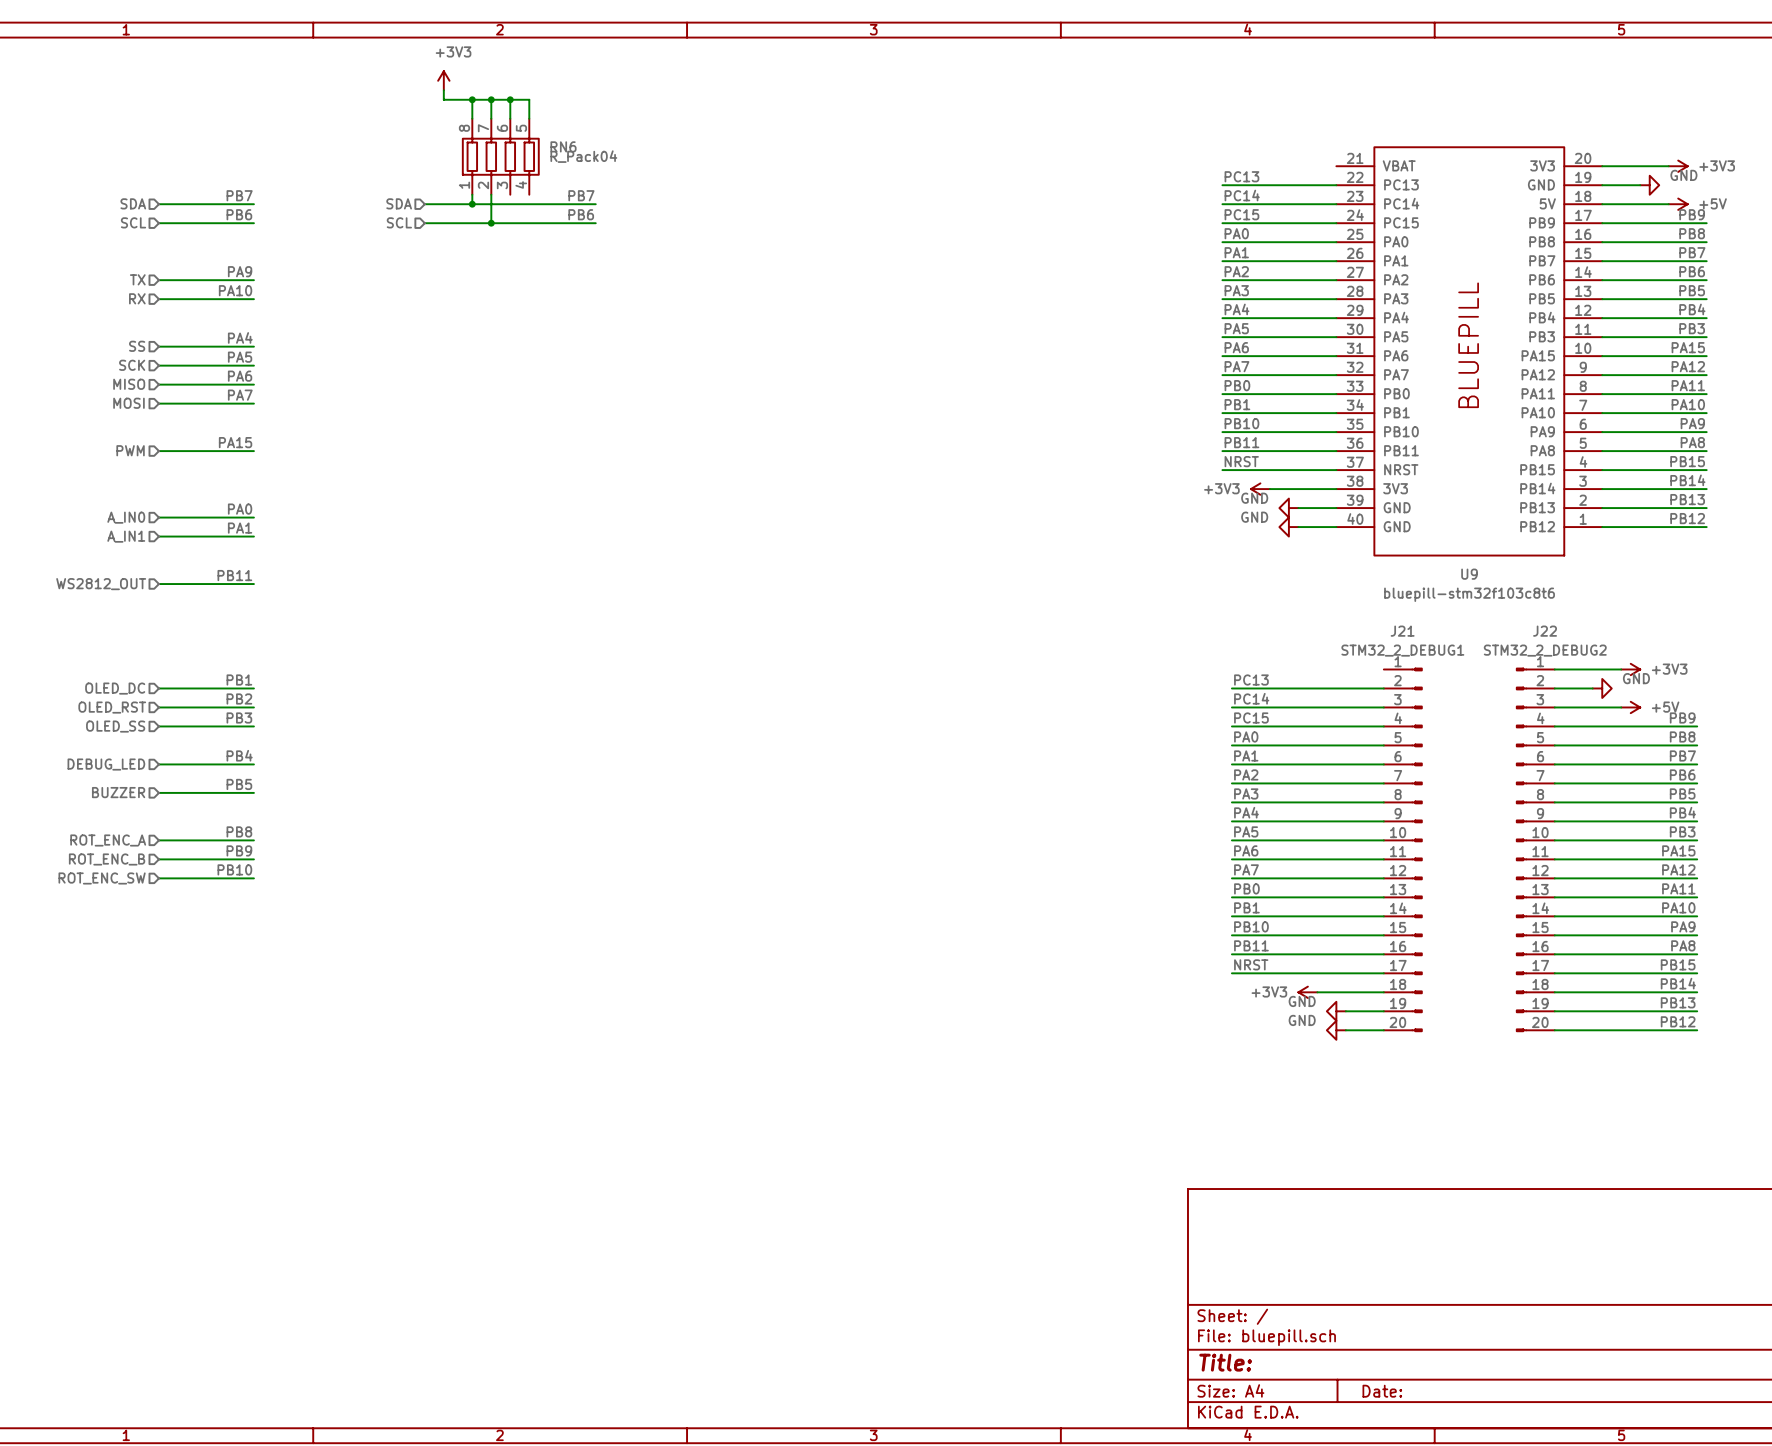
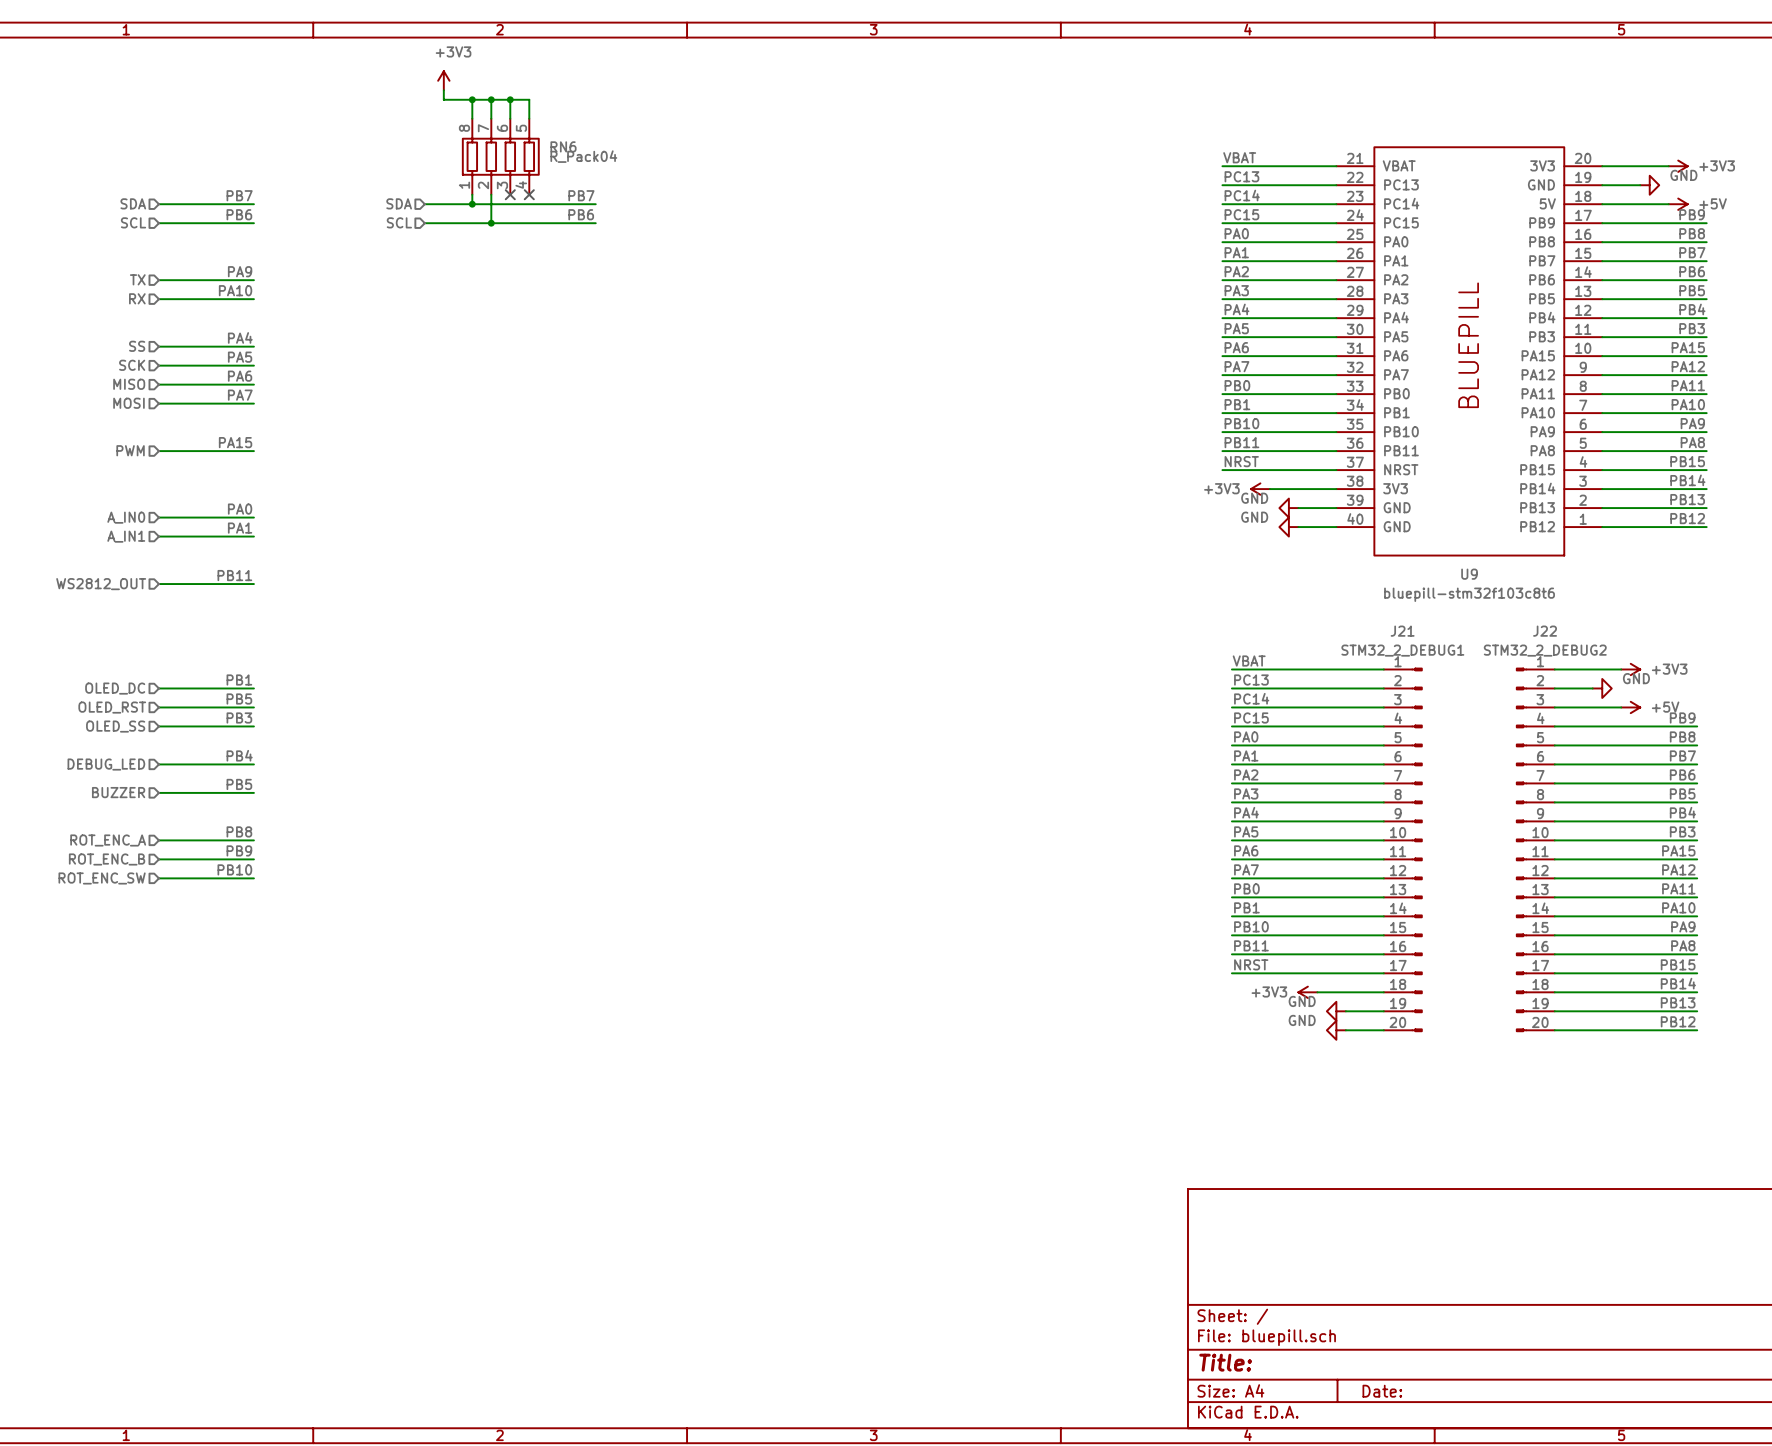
label: none -> VBAT (1239, 157)
wire: none -> (1222, 166) (1336, 166)
no-connect mark: none -> (510, 194)
no-connect mark: none -> (529, 194)
label: none -> VBAT (1249, 661)
wire: none -> (1231, 669) (1383, 669)
label: PB2 (239, 698) -> PB5 (239, 698)

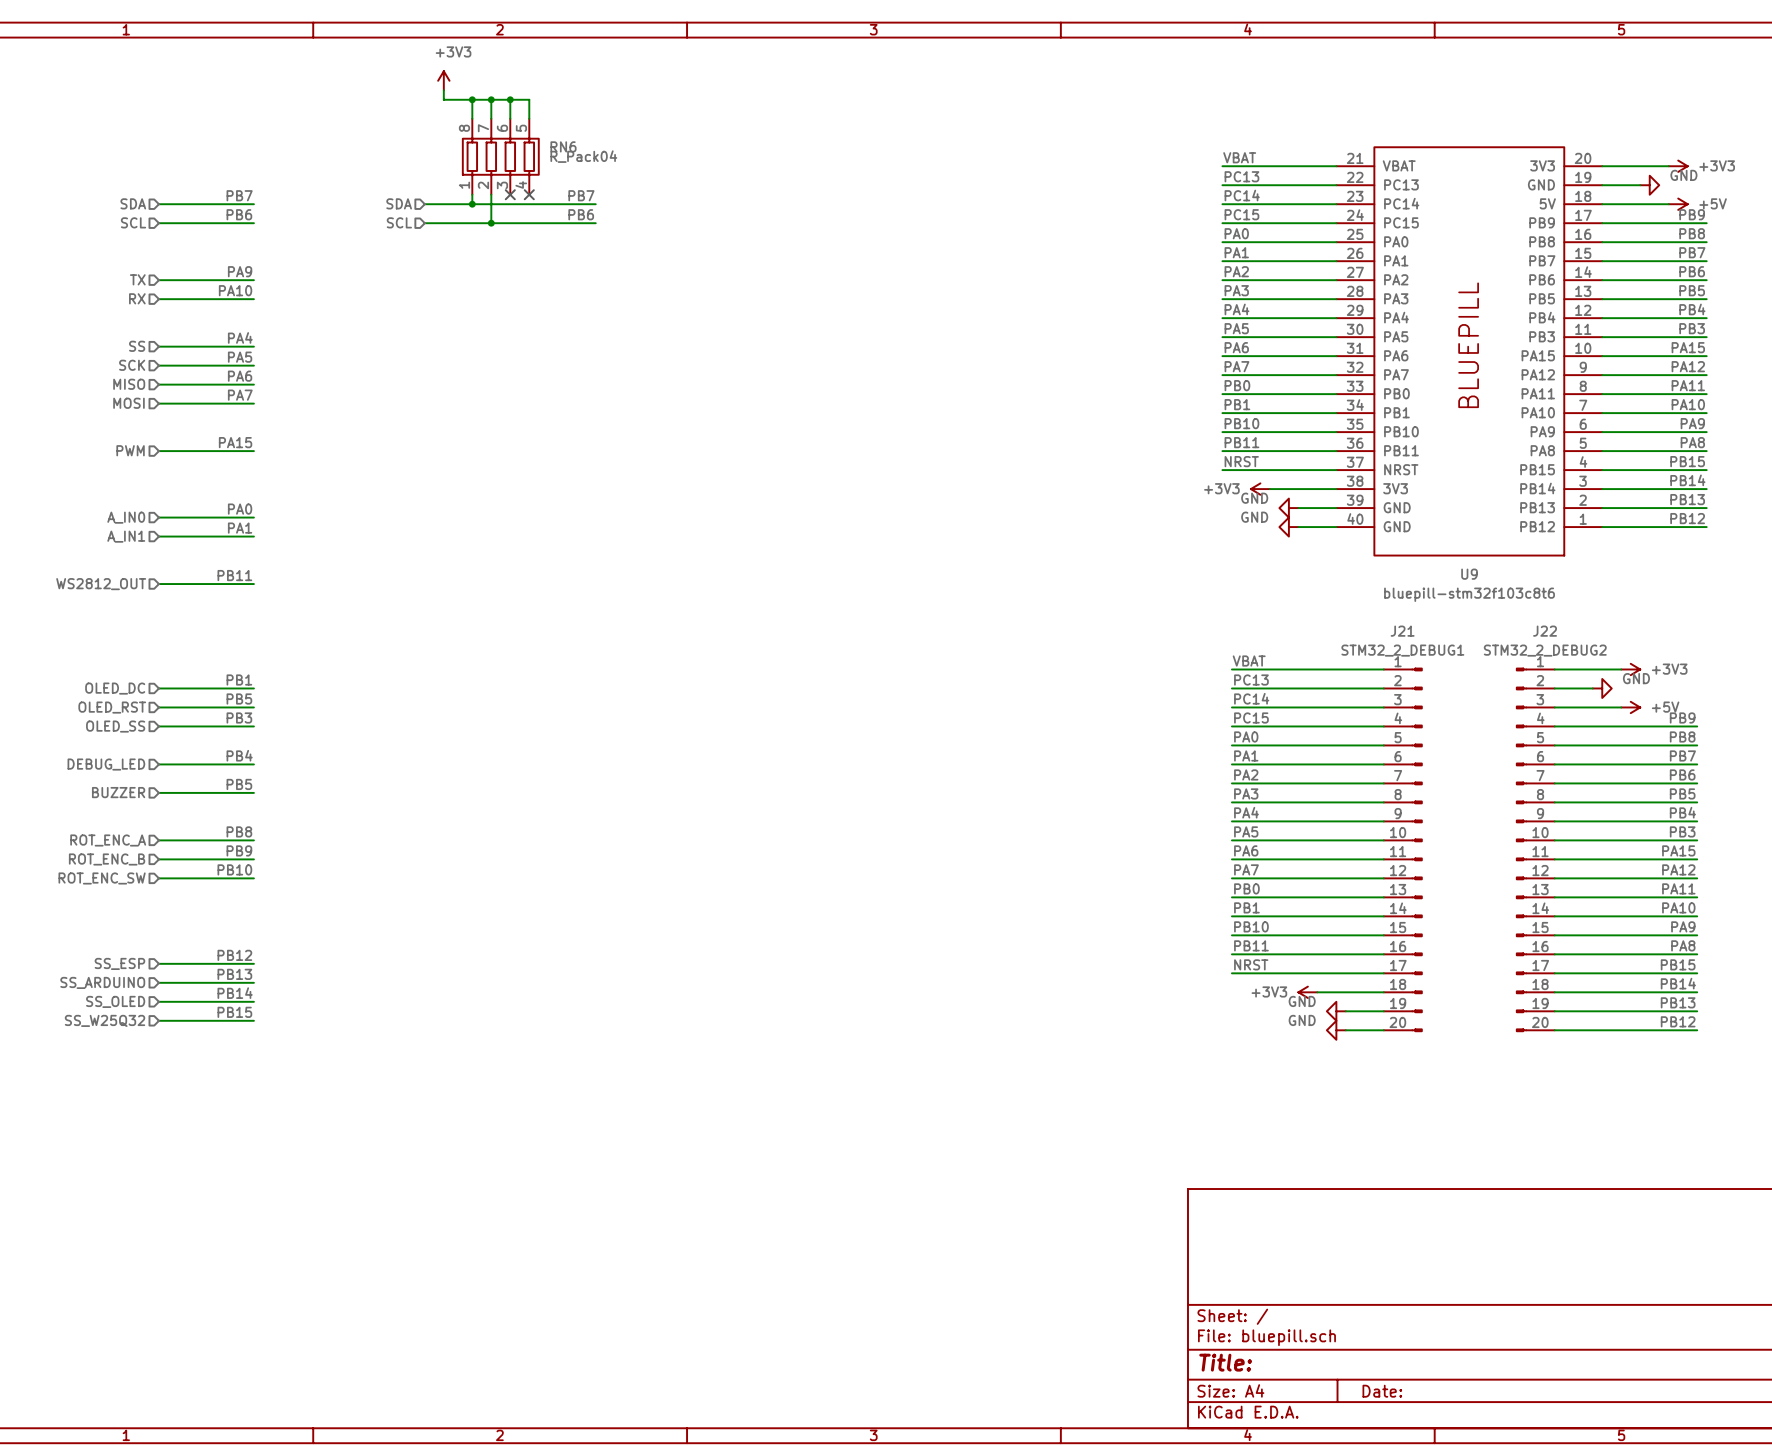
label: none -> PB12 (234, 955)
hierarchical label: none -> SS_ESP (119, 963)
wire: none -> (158, 963) (253, 963)
label: none -> PB13 (234, 974)
hierarchical label: none -> SS_ARDUINO (102, 982)
wire: none -> (158, 982) (253, 982)
label: none -> PB14 (235, 993)
hierarchical label: none -> SS_OLED (115, 1001)
wire: none -> (158, 1001) (253, 1001)
label: none -> PB15 (234, 1012)
hierarchical label: none -> SS_W25Q32 (105, 1020)
wire: none -> (158, 1020) (253, 1020)

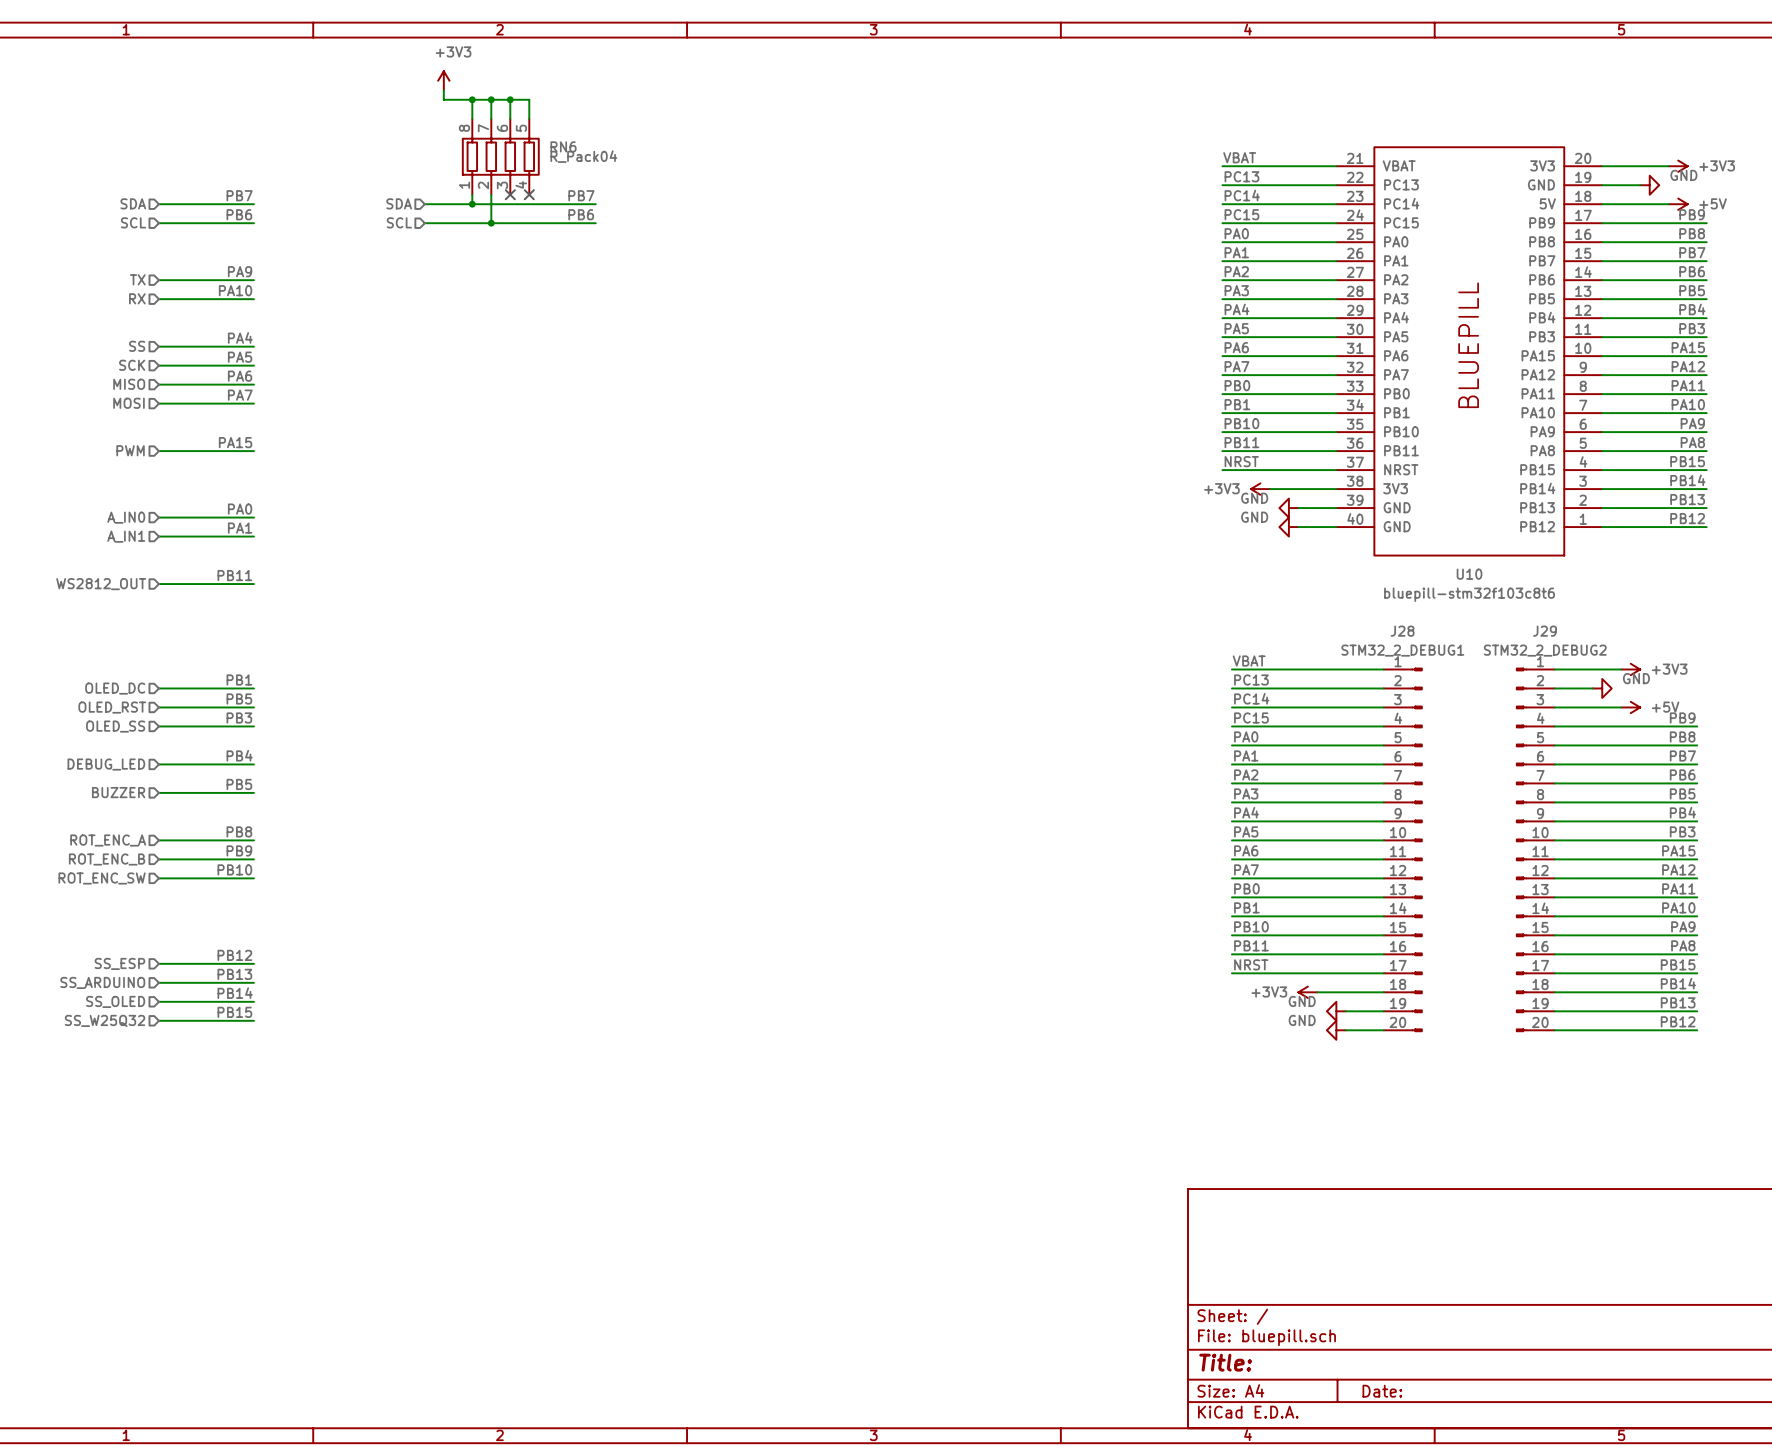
U9 name: U9 (1469, 574) -> U10 (1469, 574)
J21 name: J21 (1402, 631) -> J28 (1402, 631)
J22 name: J22 (1545, 631) -> J29 (1545, 631)

